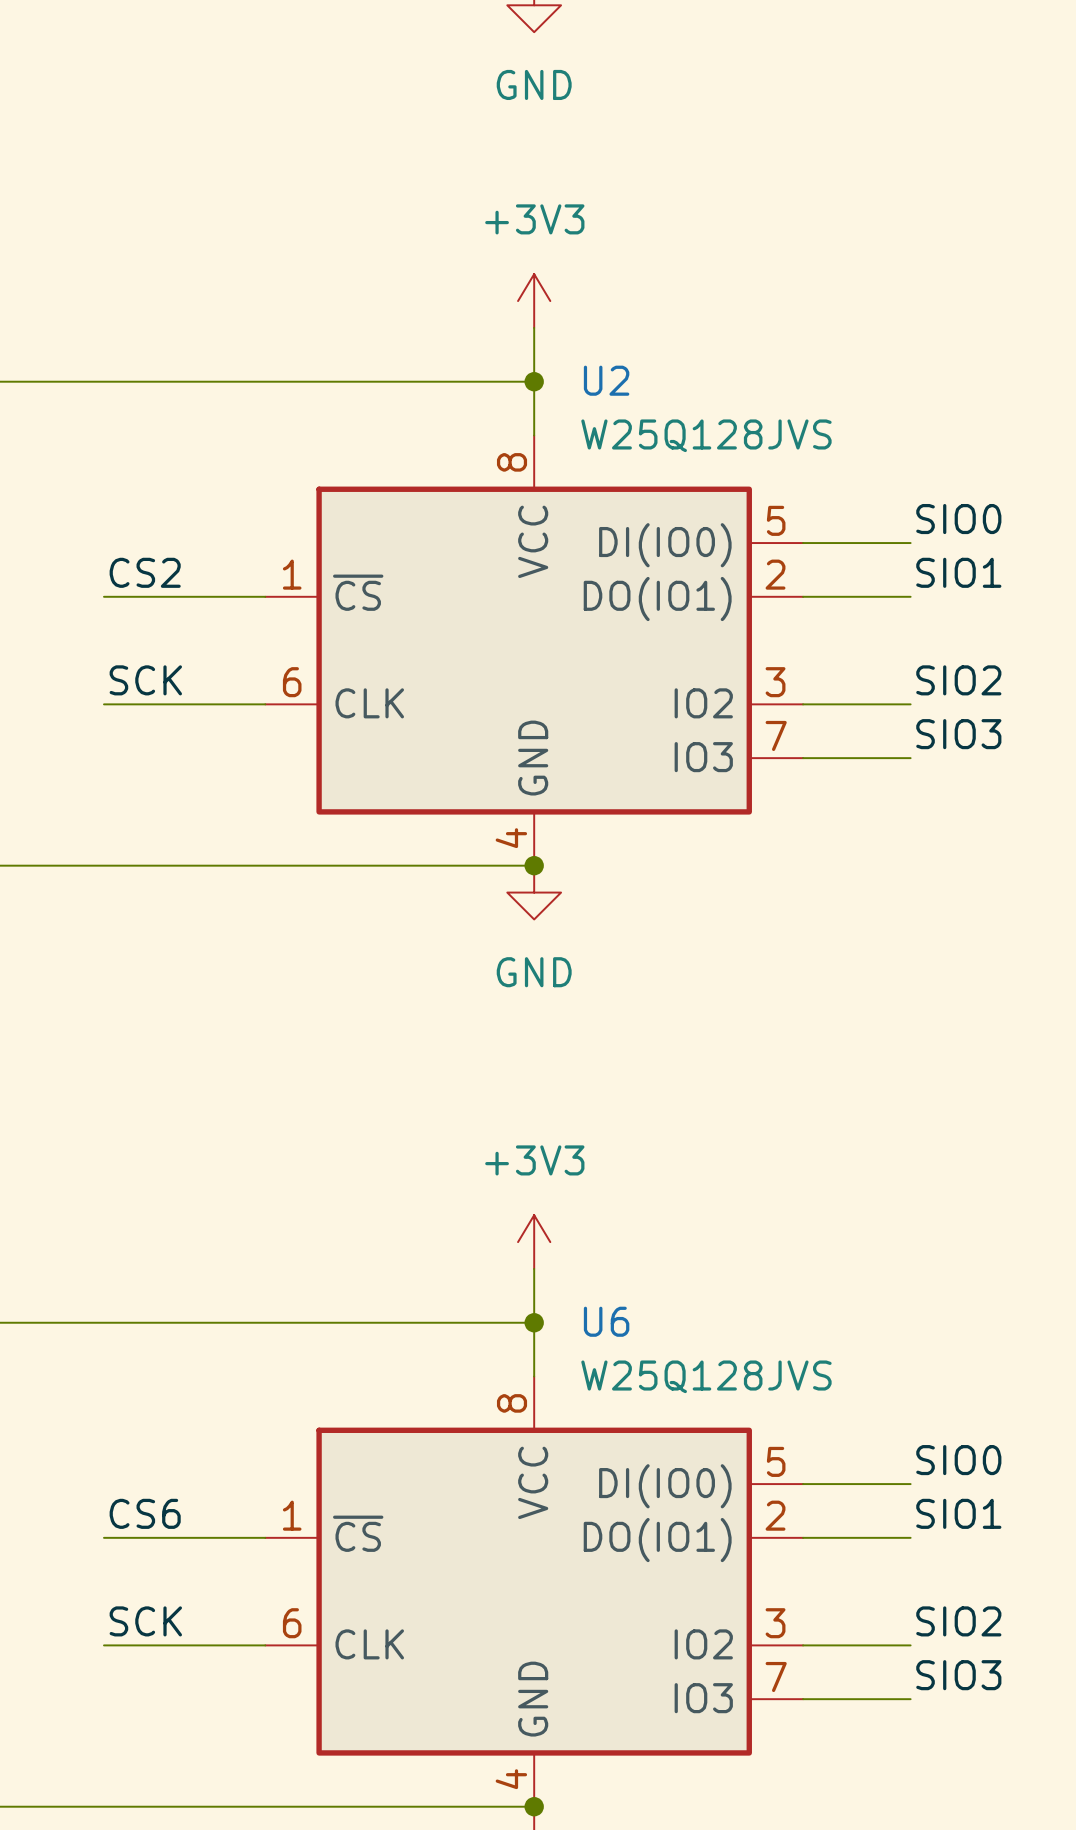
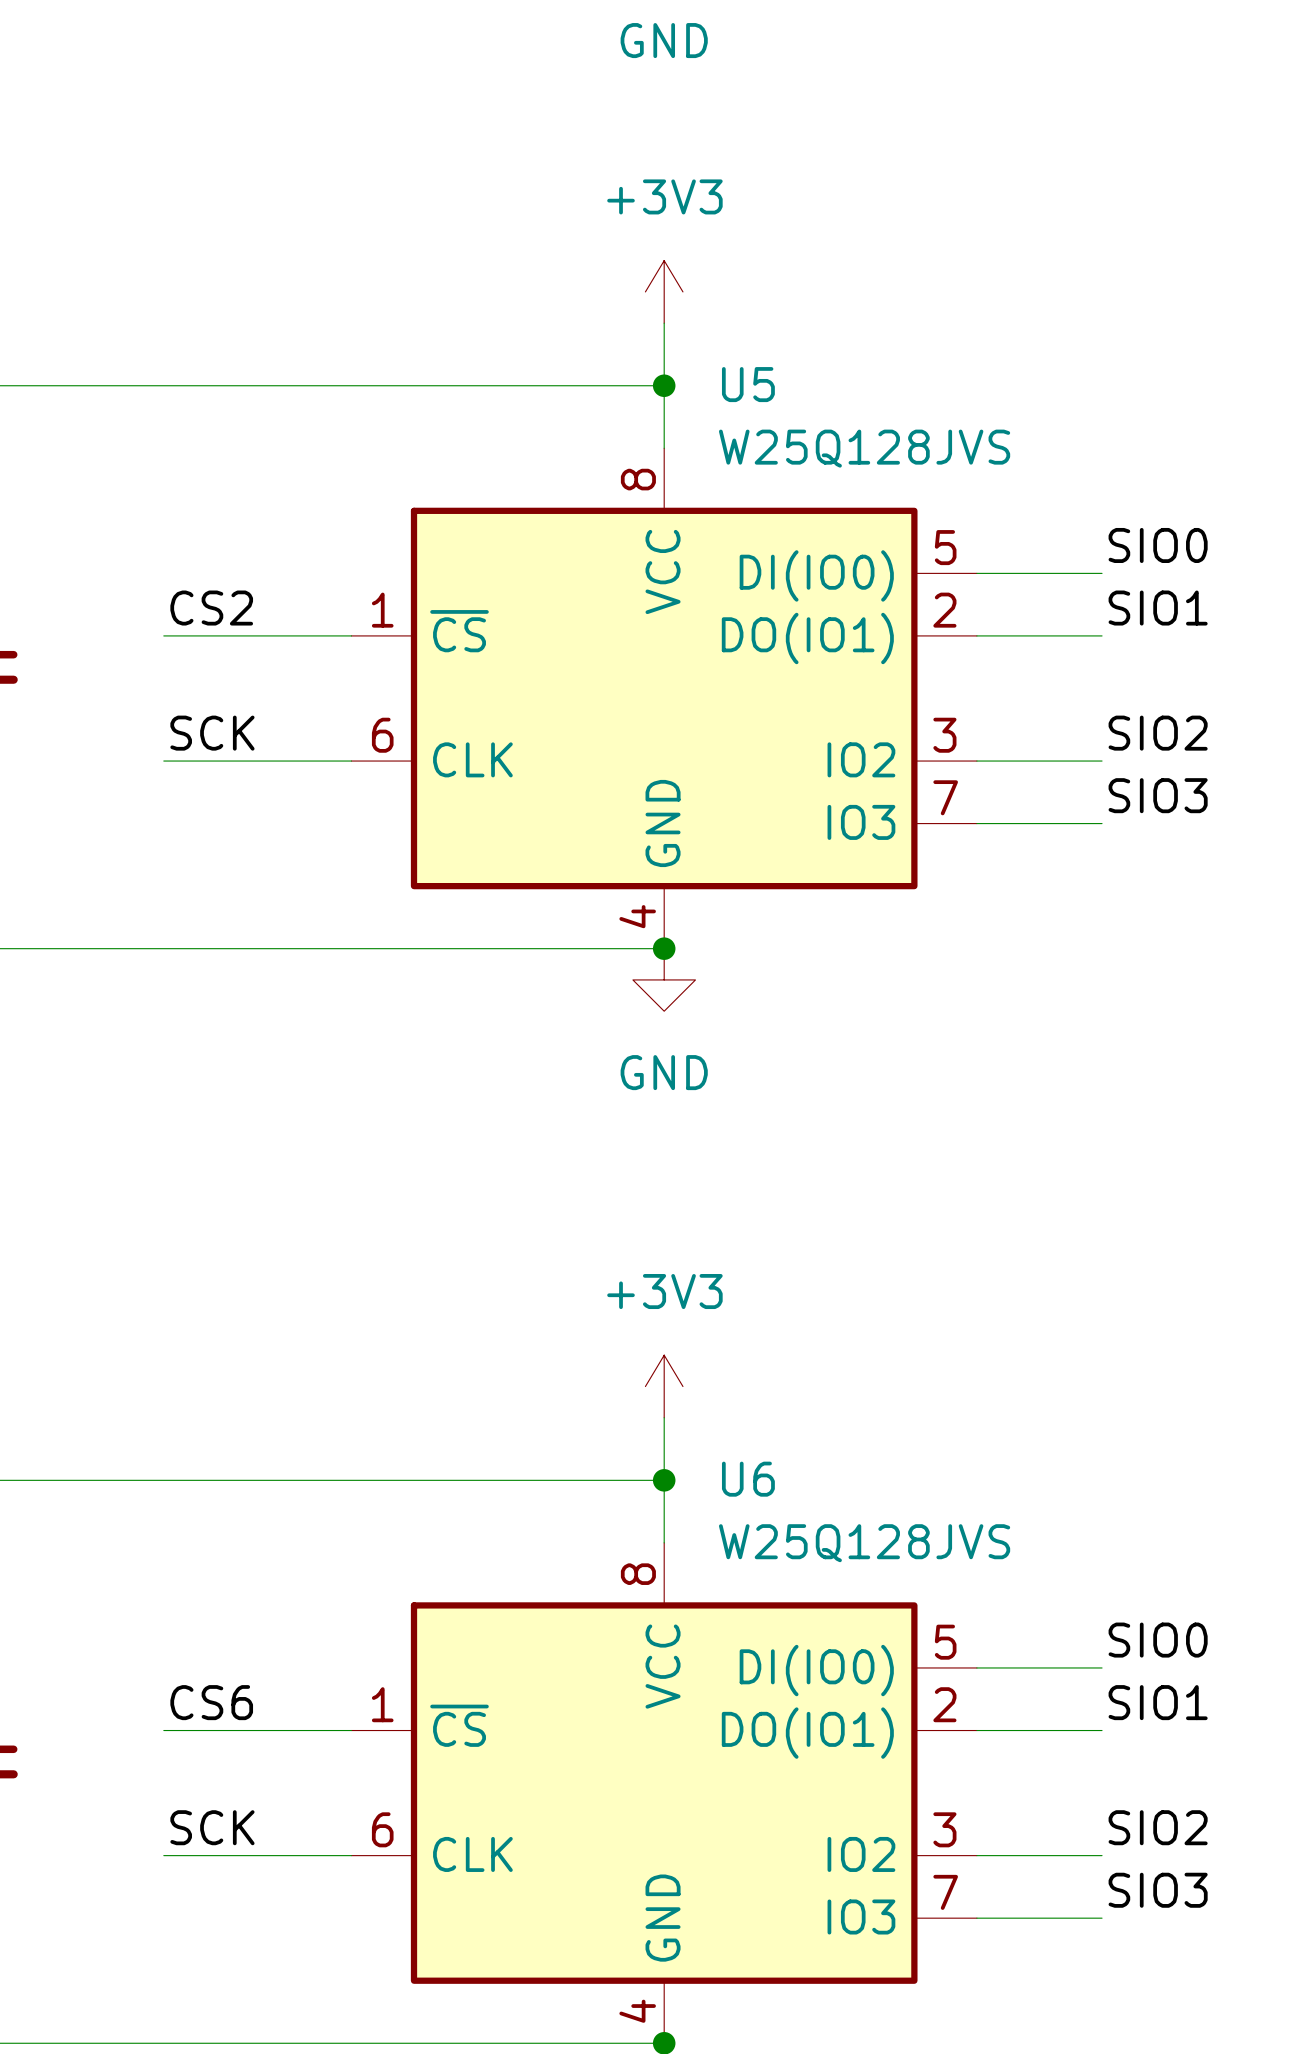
U2 name: U2 (606, 380) -> U5 (748, 384)

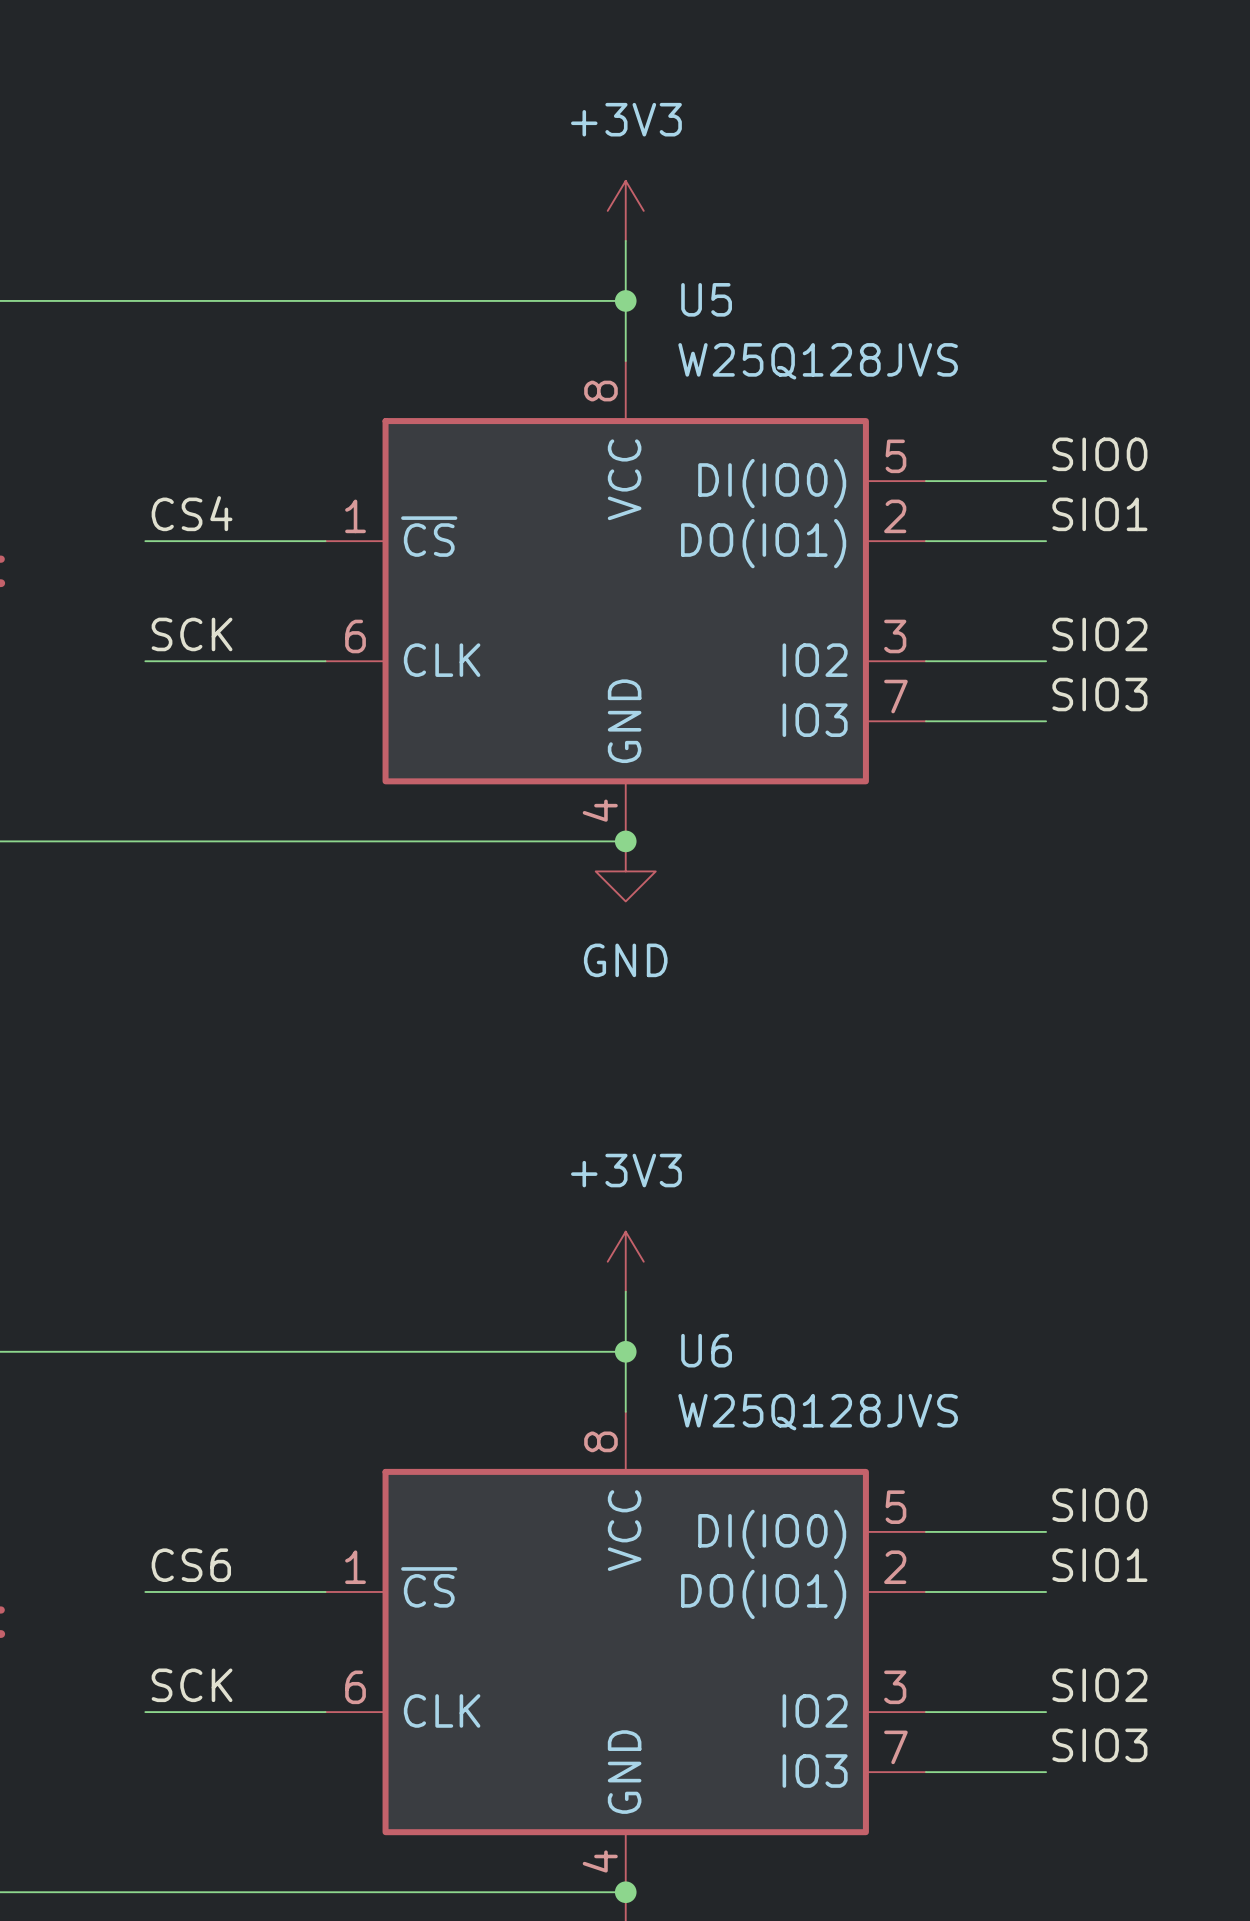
label: CS2 (211, 608) -> CS4 (192, 513)

